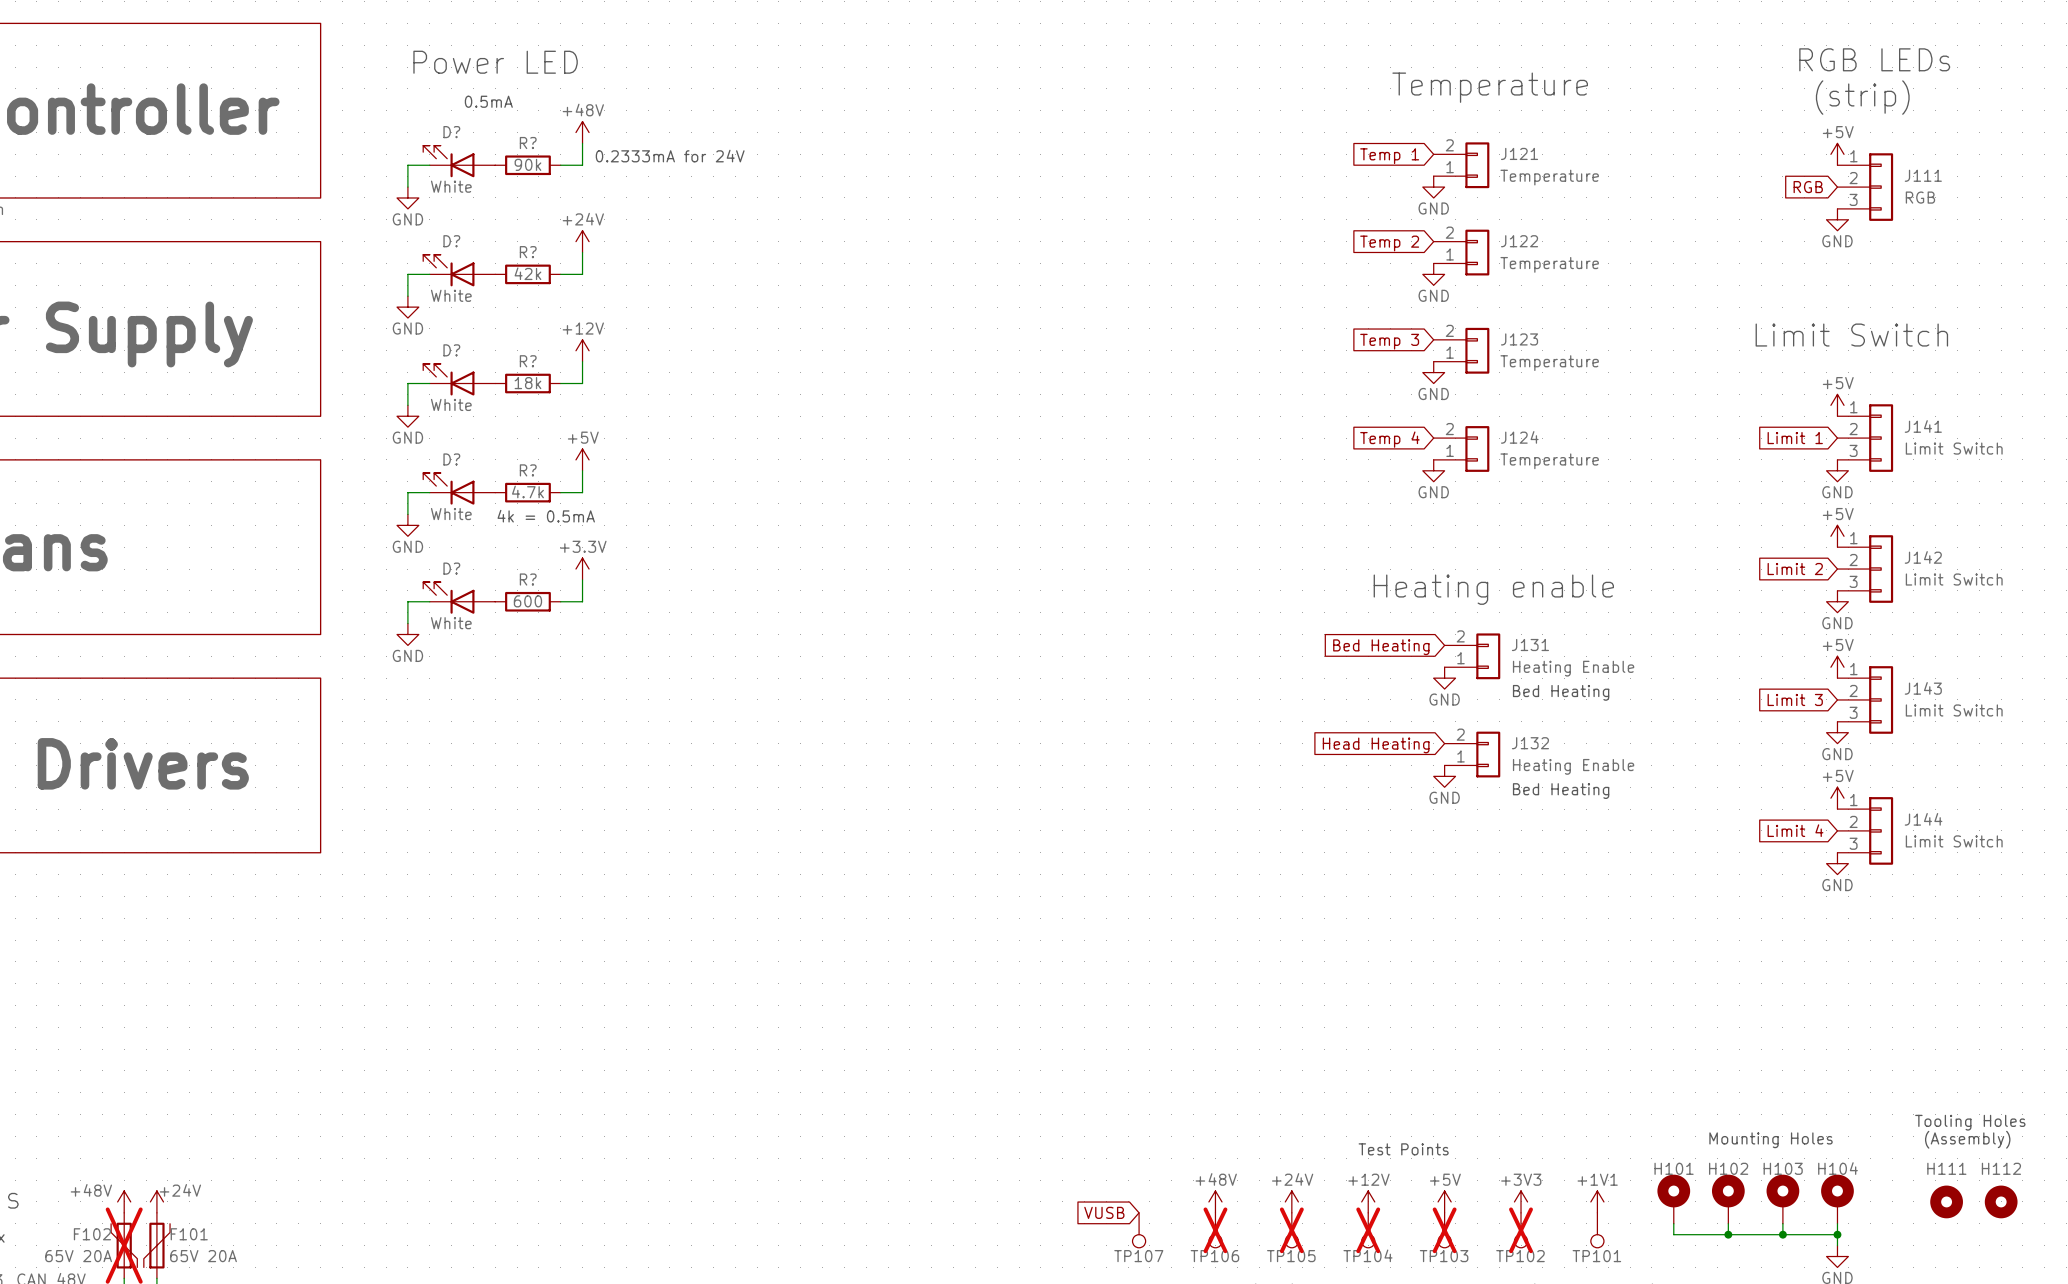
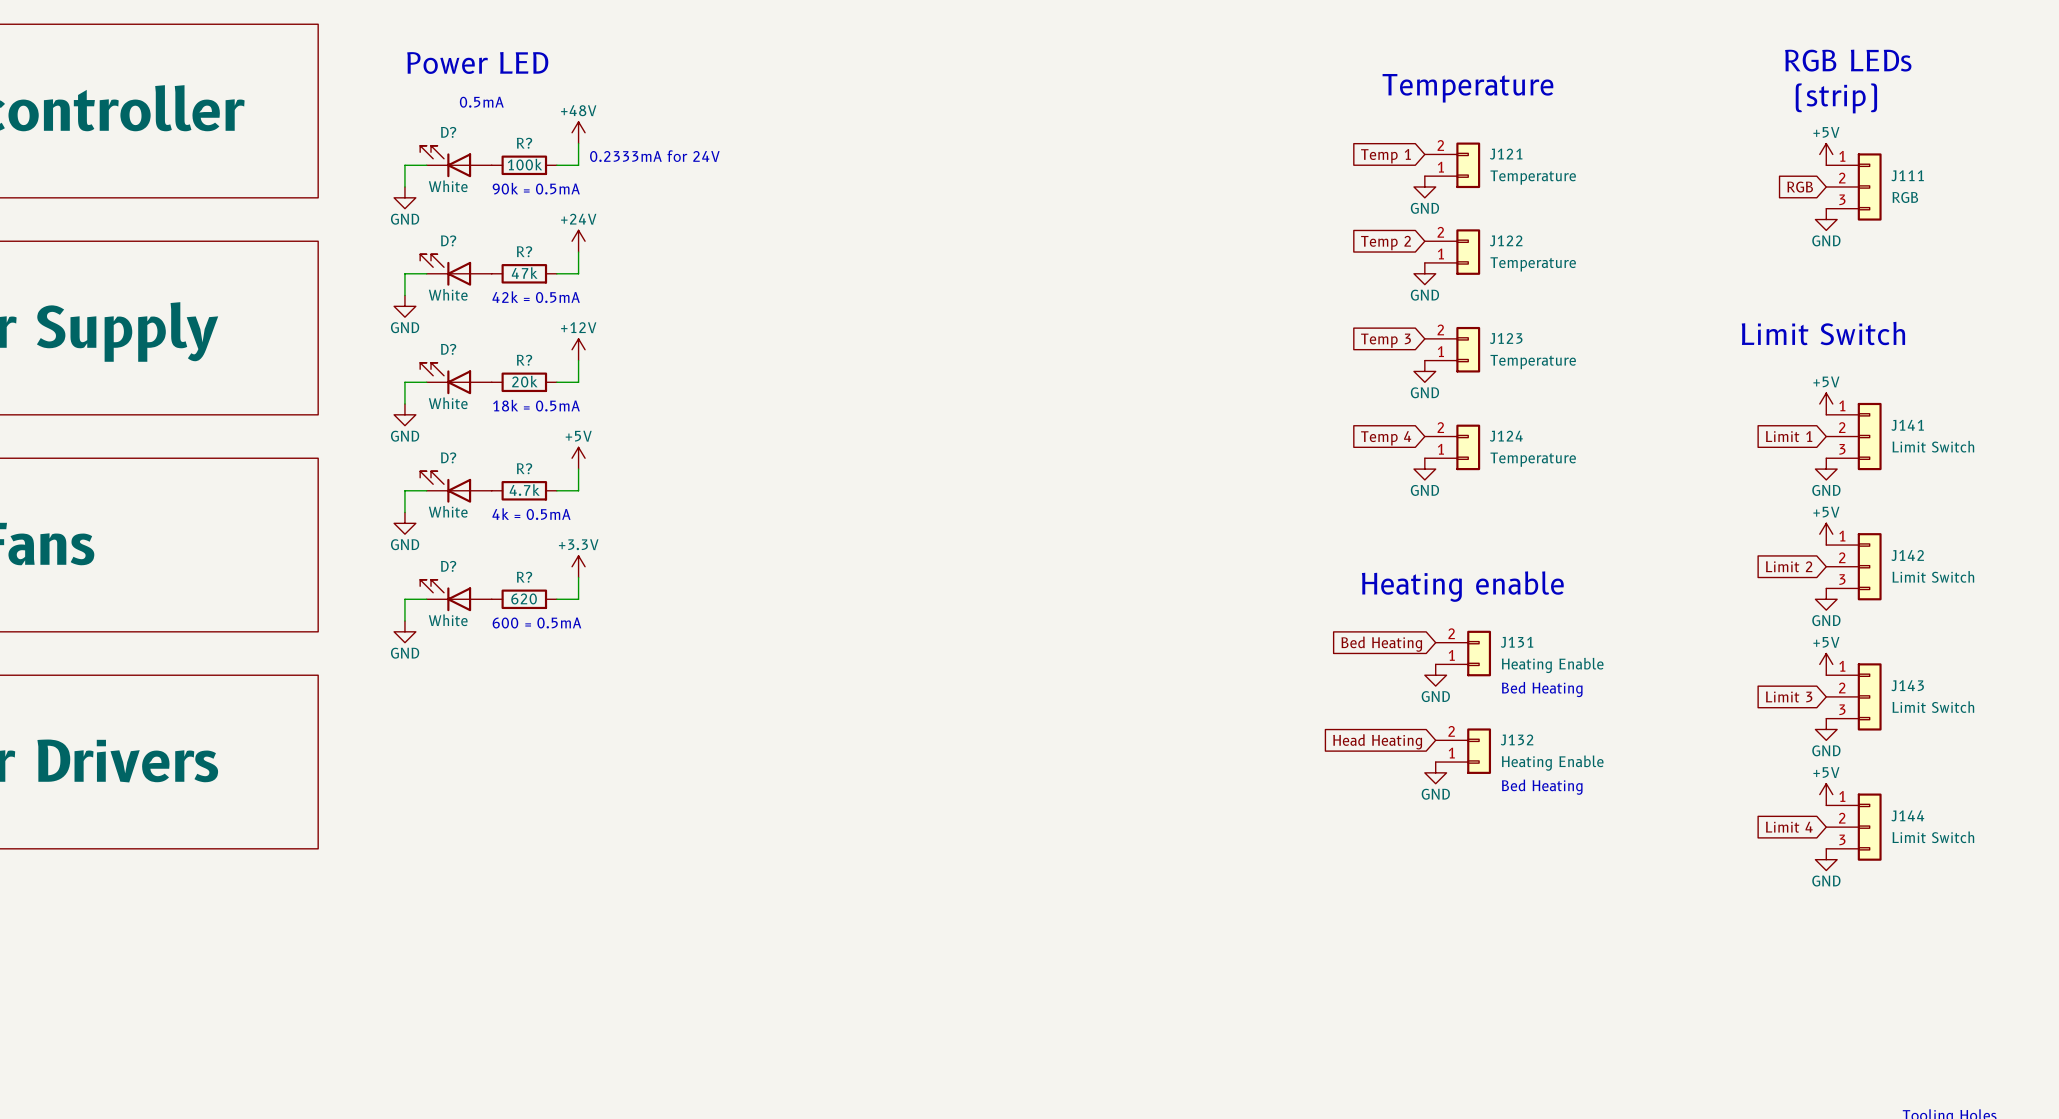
R? value: 90k (527, 164) -> 100k (525, 164)
text: none -> 90k = 0.5mA (536, 188)
R? value: 42k (527, 273) -> 47k (524, 273)
text: none -> 42k = 0.5mA (536, 297)
R? value: 18k (527, 383) -> 20k (524, 381)
text: none -> 18k = 0.5mA (536, 405)
R? value: 600 (527, 601) -> 620 (524, 598)
text: none -> 600 = 0.5mA (536, 623)

